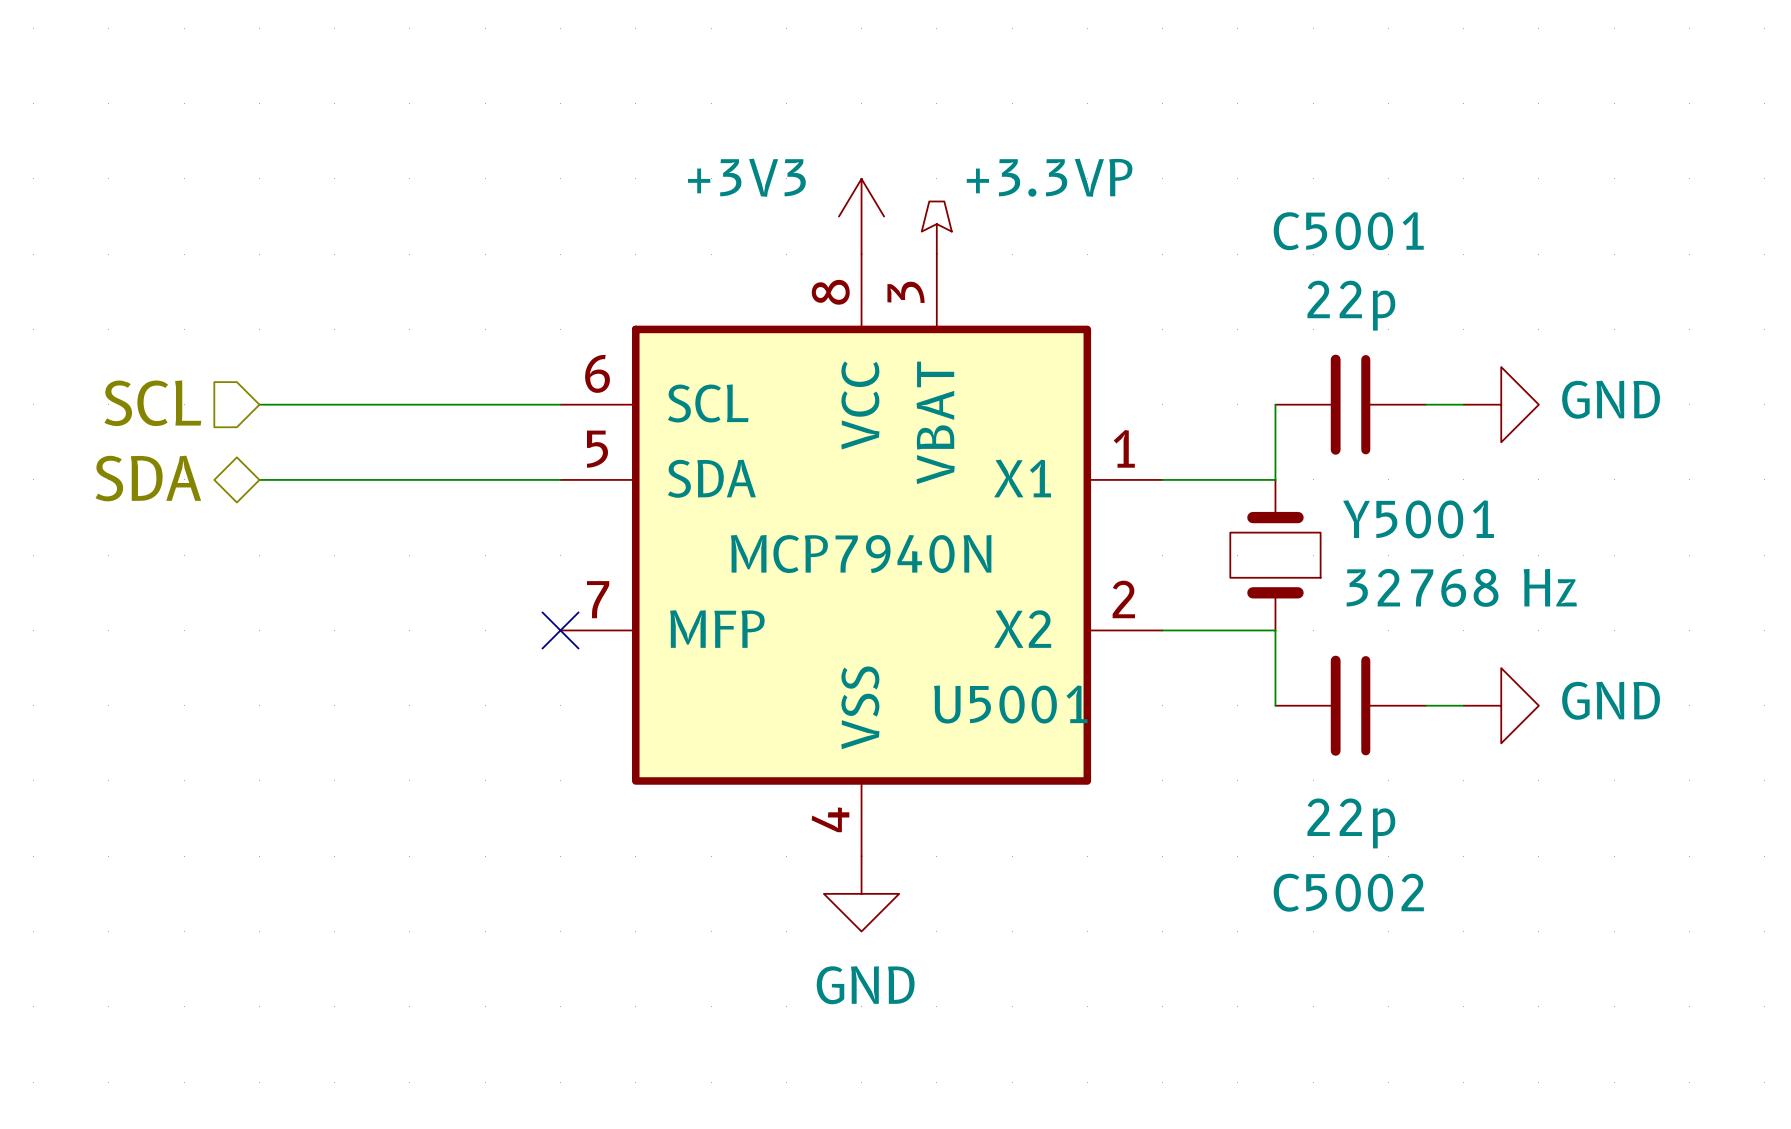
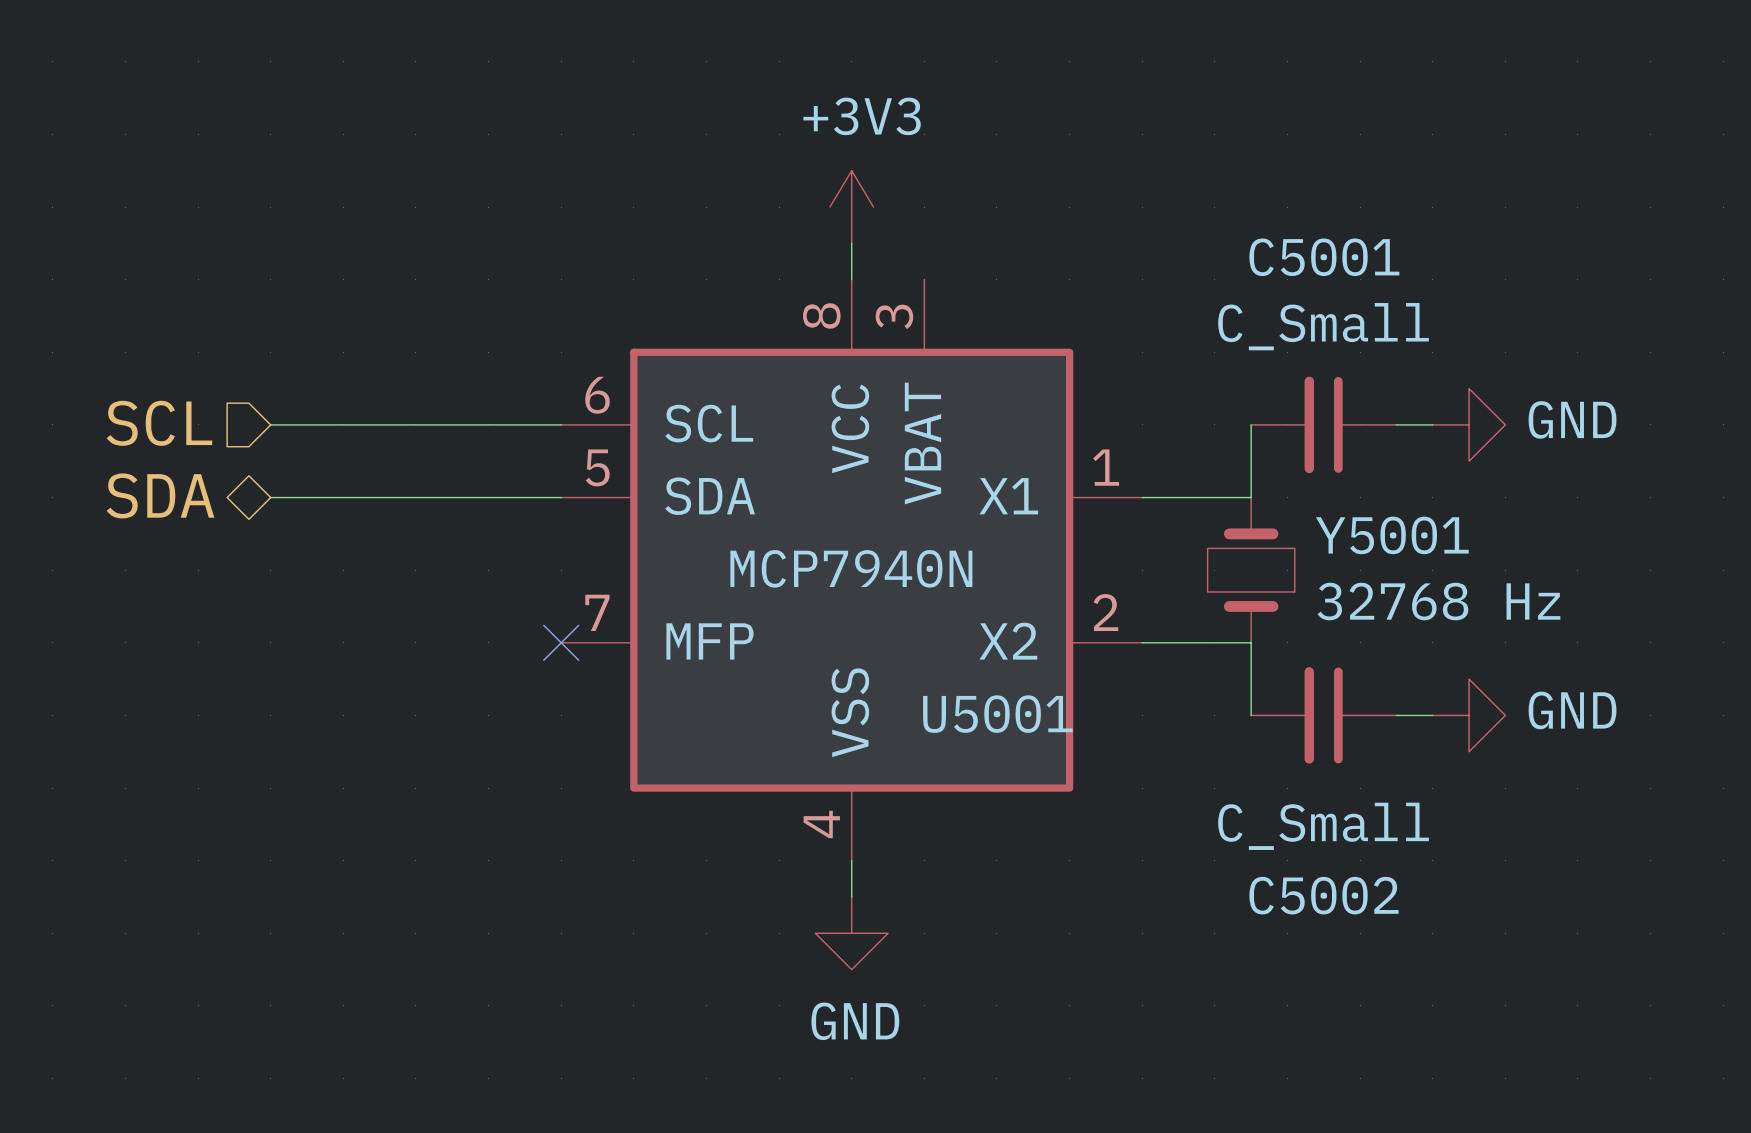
power symbol text position: +3V3 (746, 177) -> +3V3 (862, 116)
power symbol position: +3V3 (861, 216) -> +3V3 (851, 207)
power symbol: +3.3VP (936, 227) -> none
C5001 value: 22p (1351, 305) -> C_Small (1323, 326)
C5002 value: 22p (1351, 823) -> C_Small (1323, 826)
power symbol position: GND (861, 893) -> GND (851, 933)

